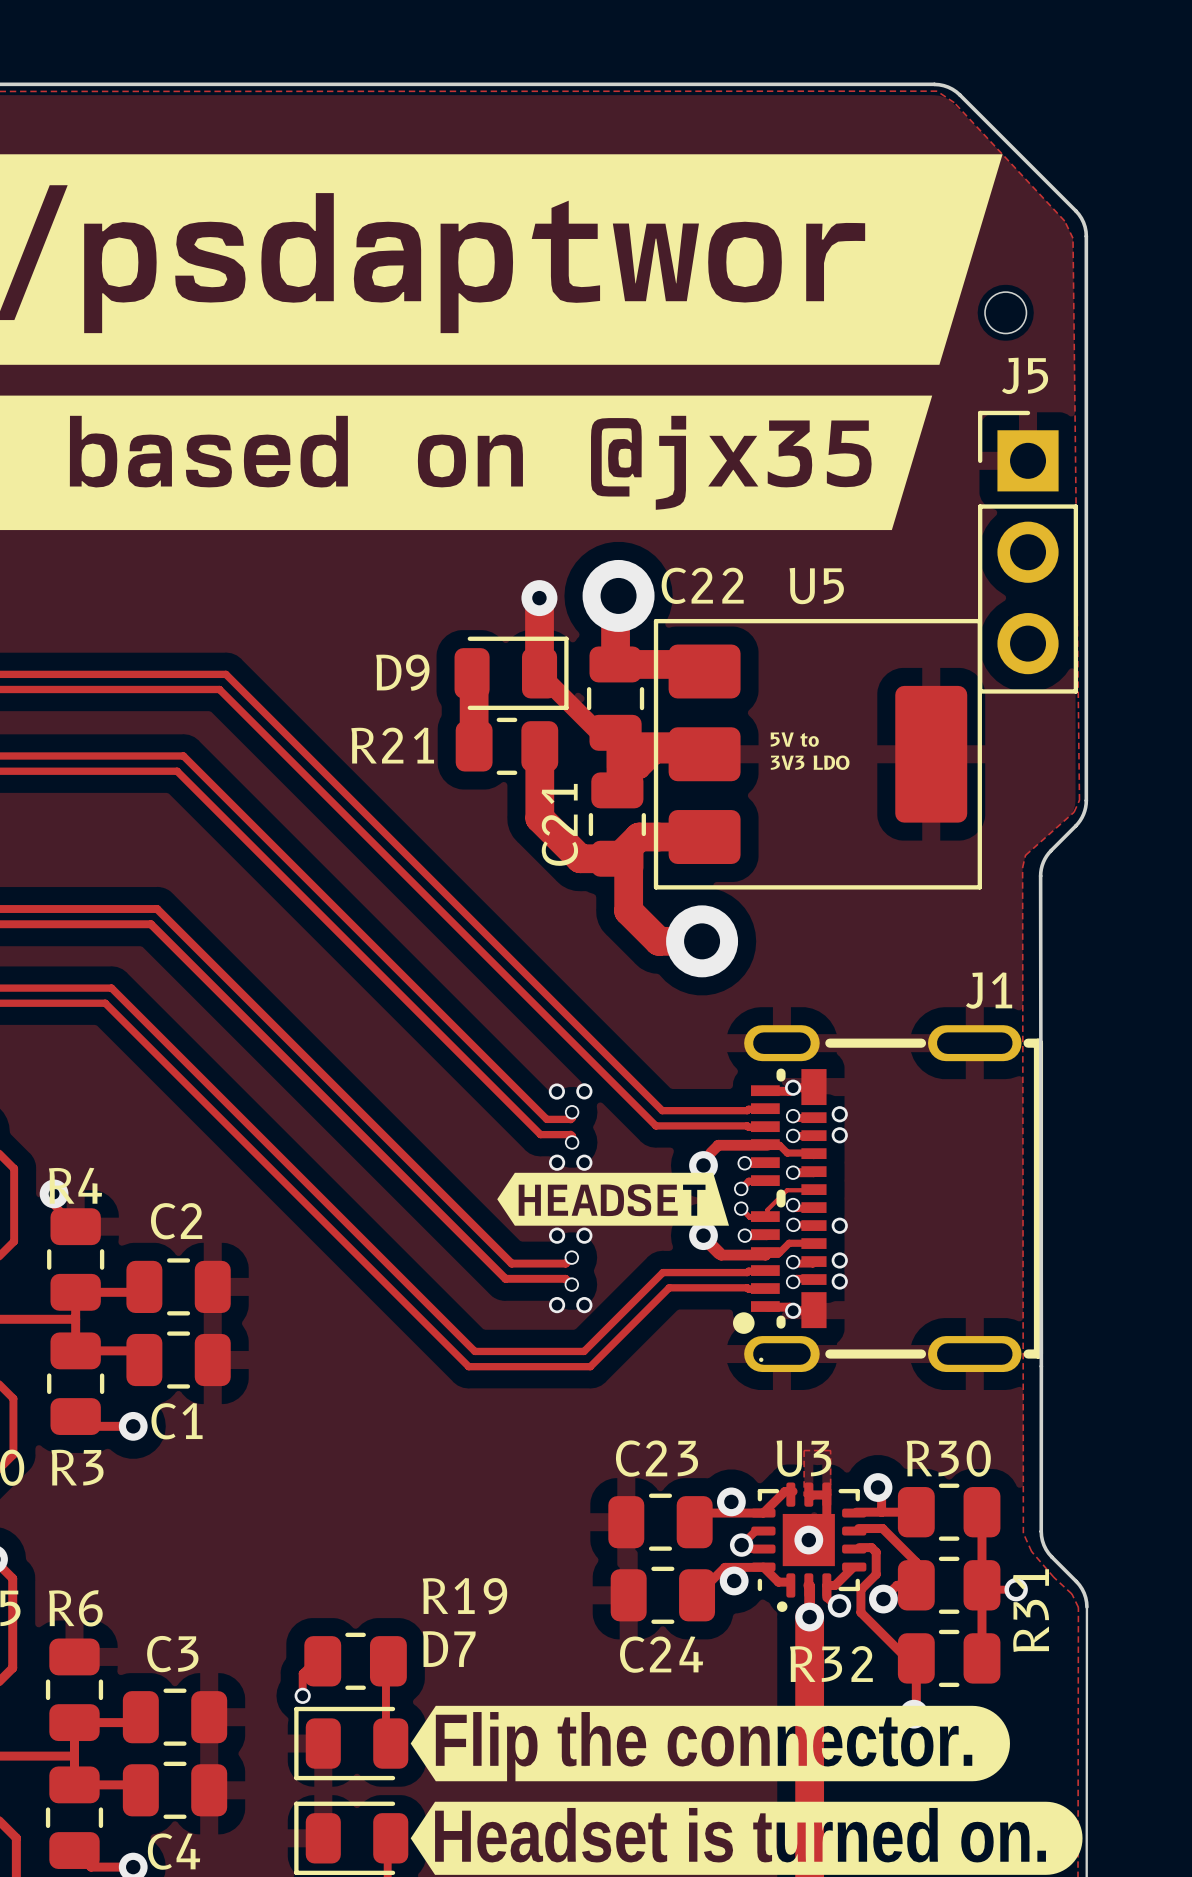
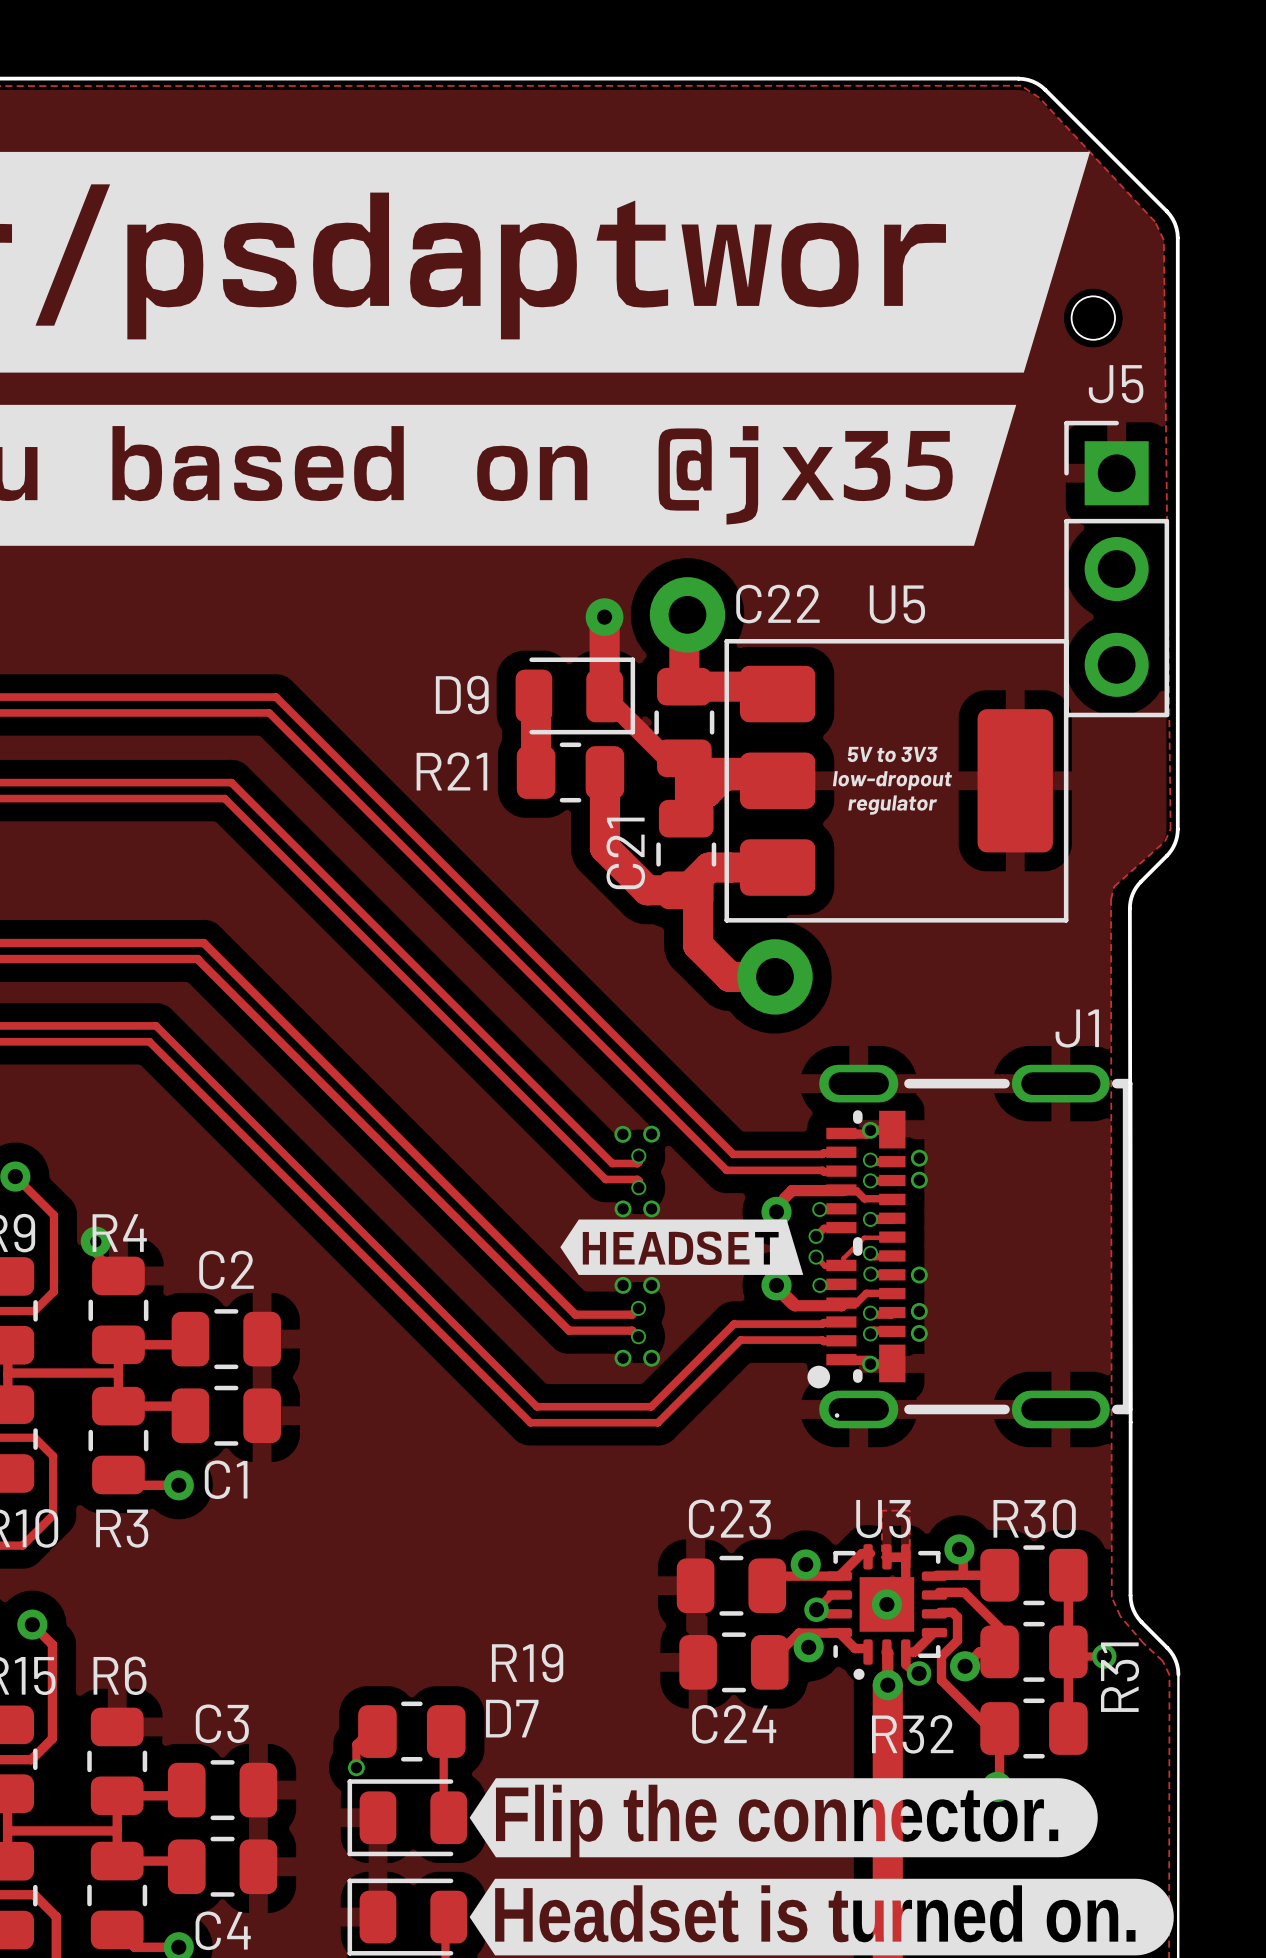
text: 5V to (794, 739) -> 5V to 3V3 (892, 754)
text: none -> low-dropout (892, 780)
text: 3V3 LDO (810, 762) -> none
text: none -> regulator (892, 805)

